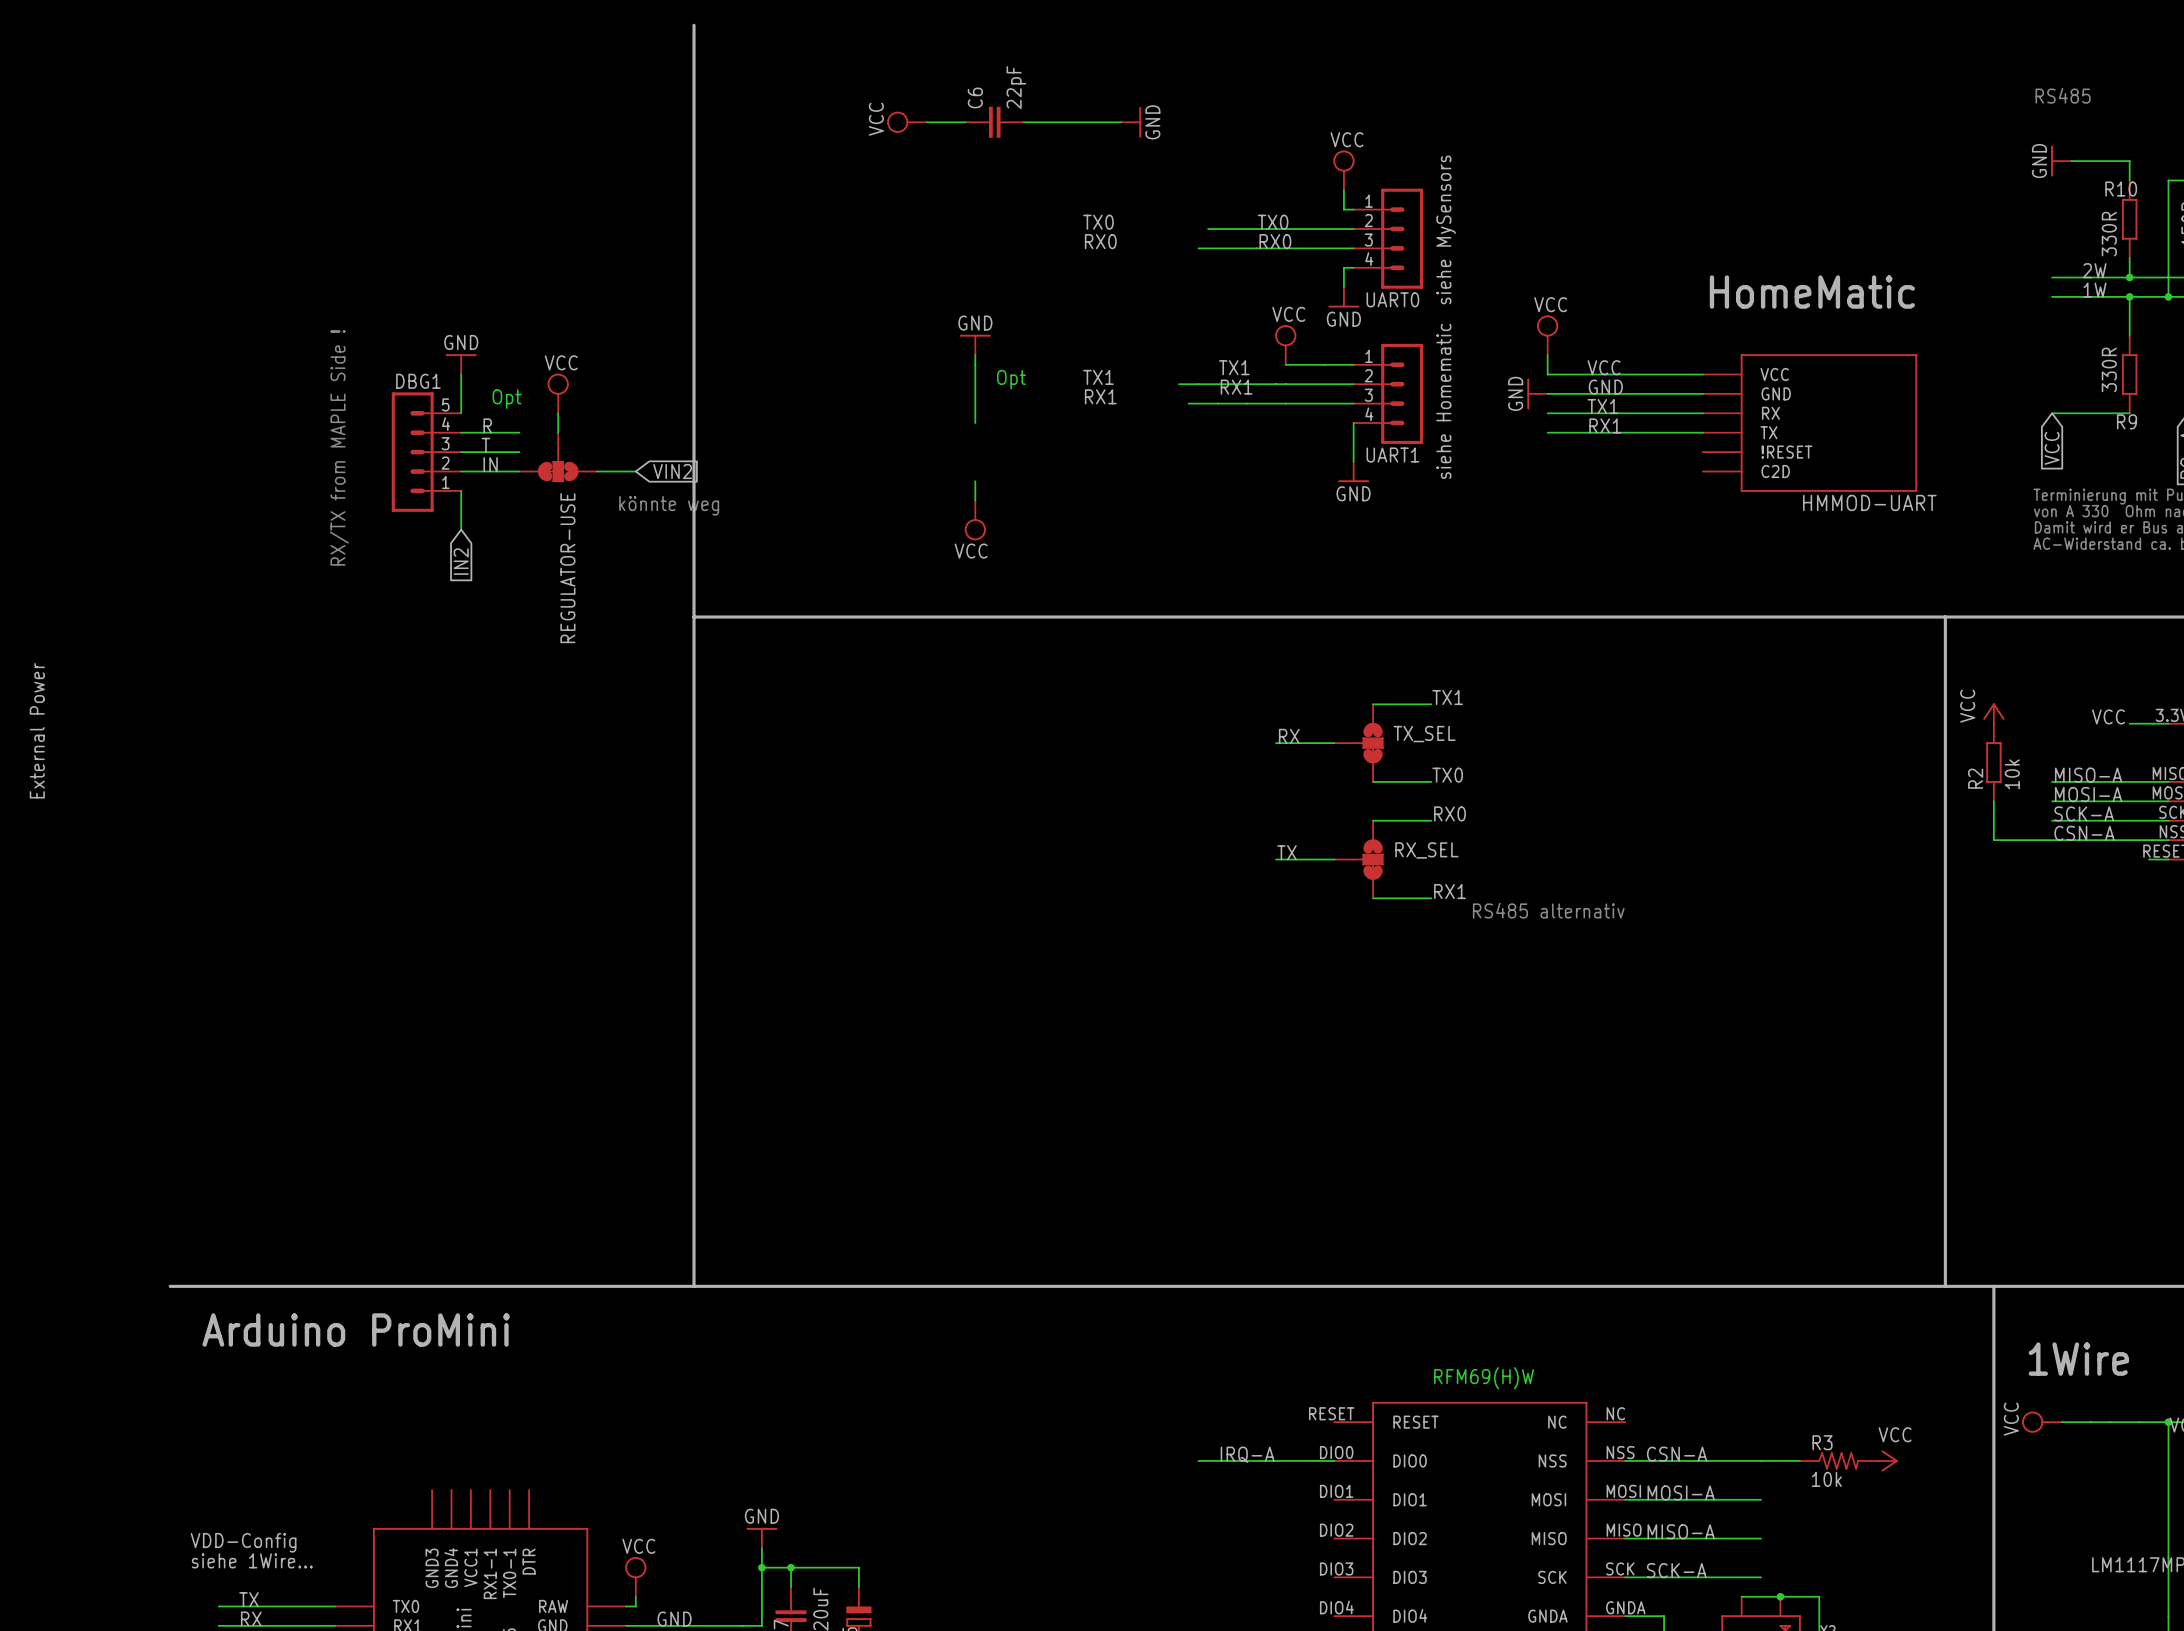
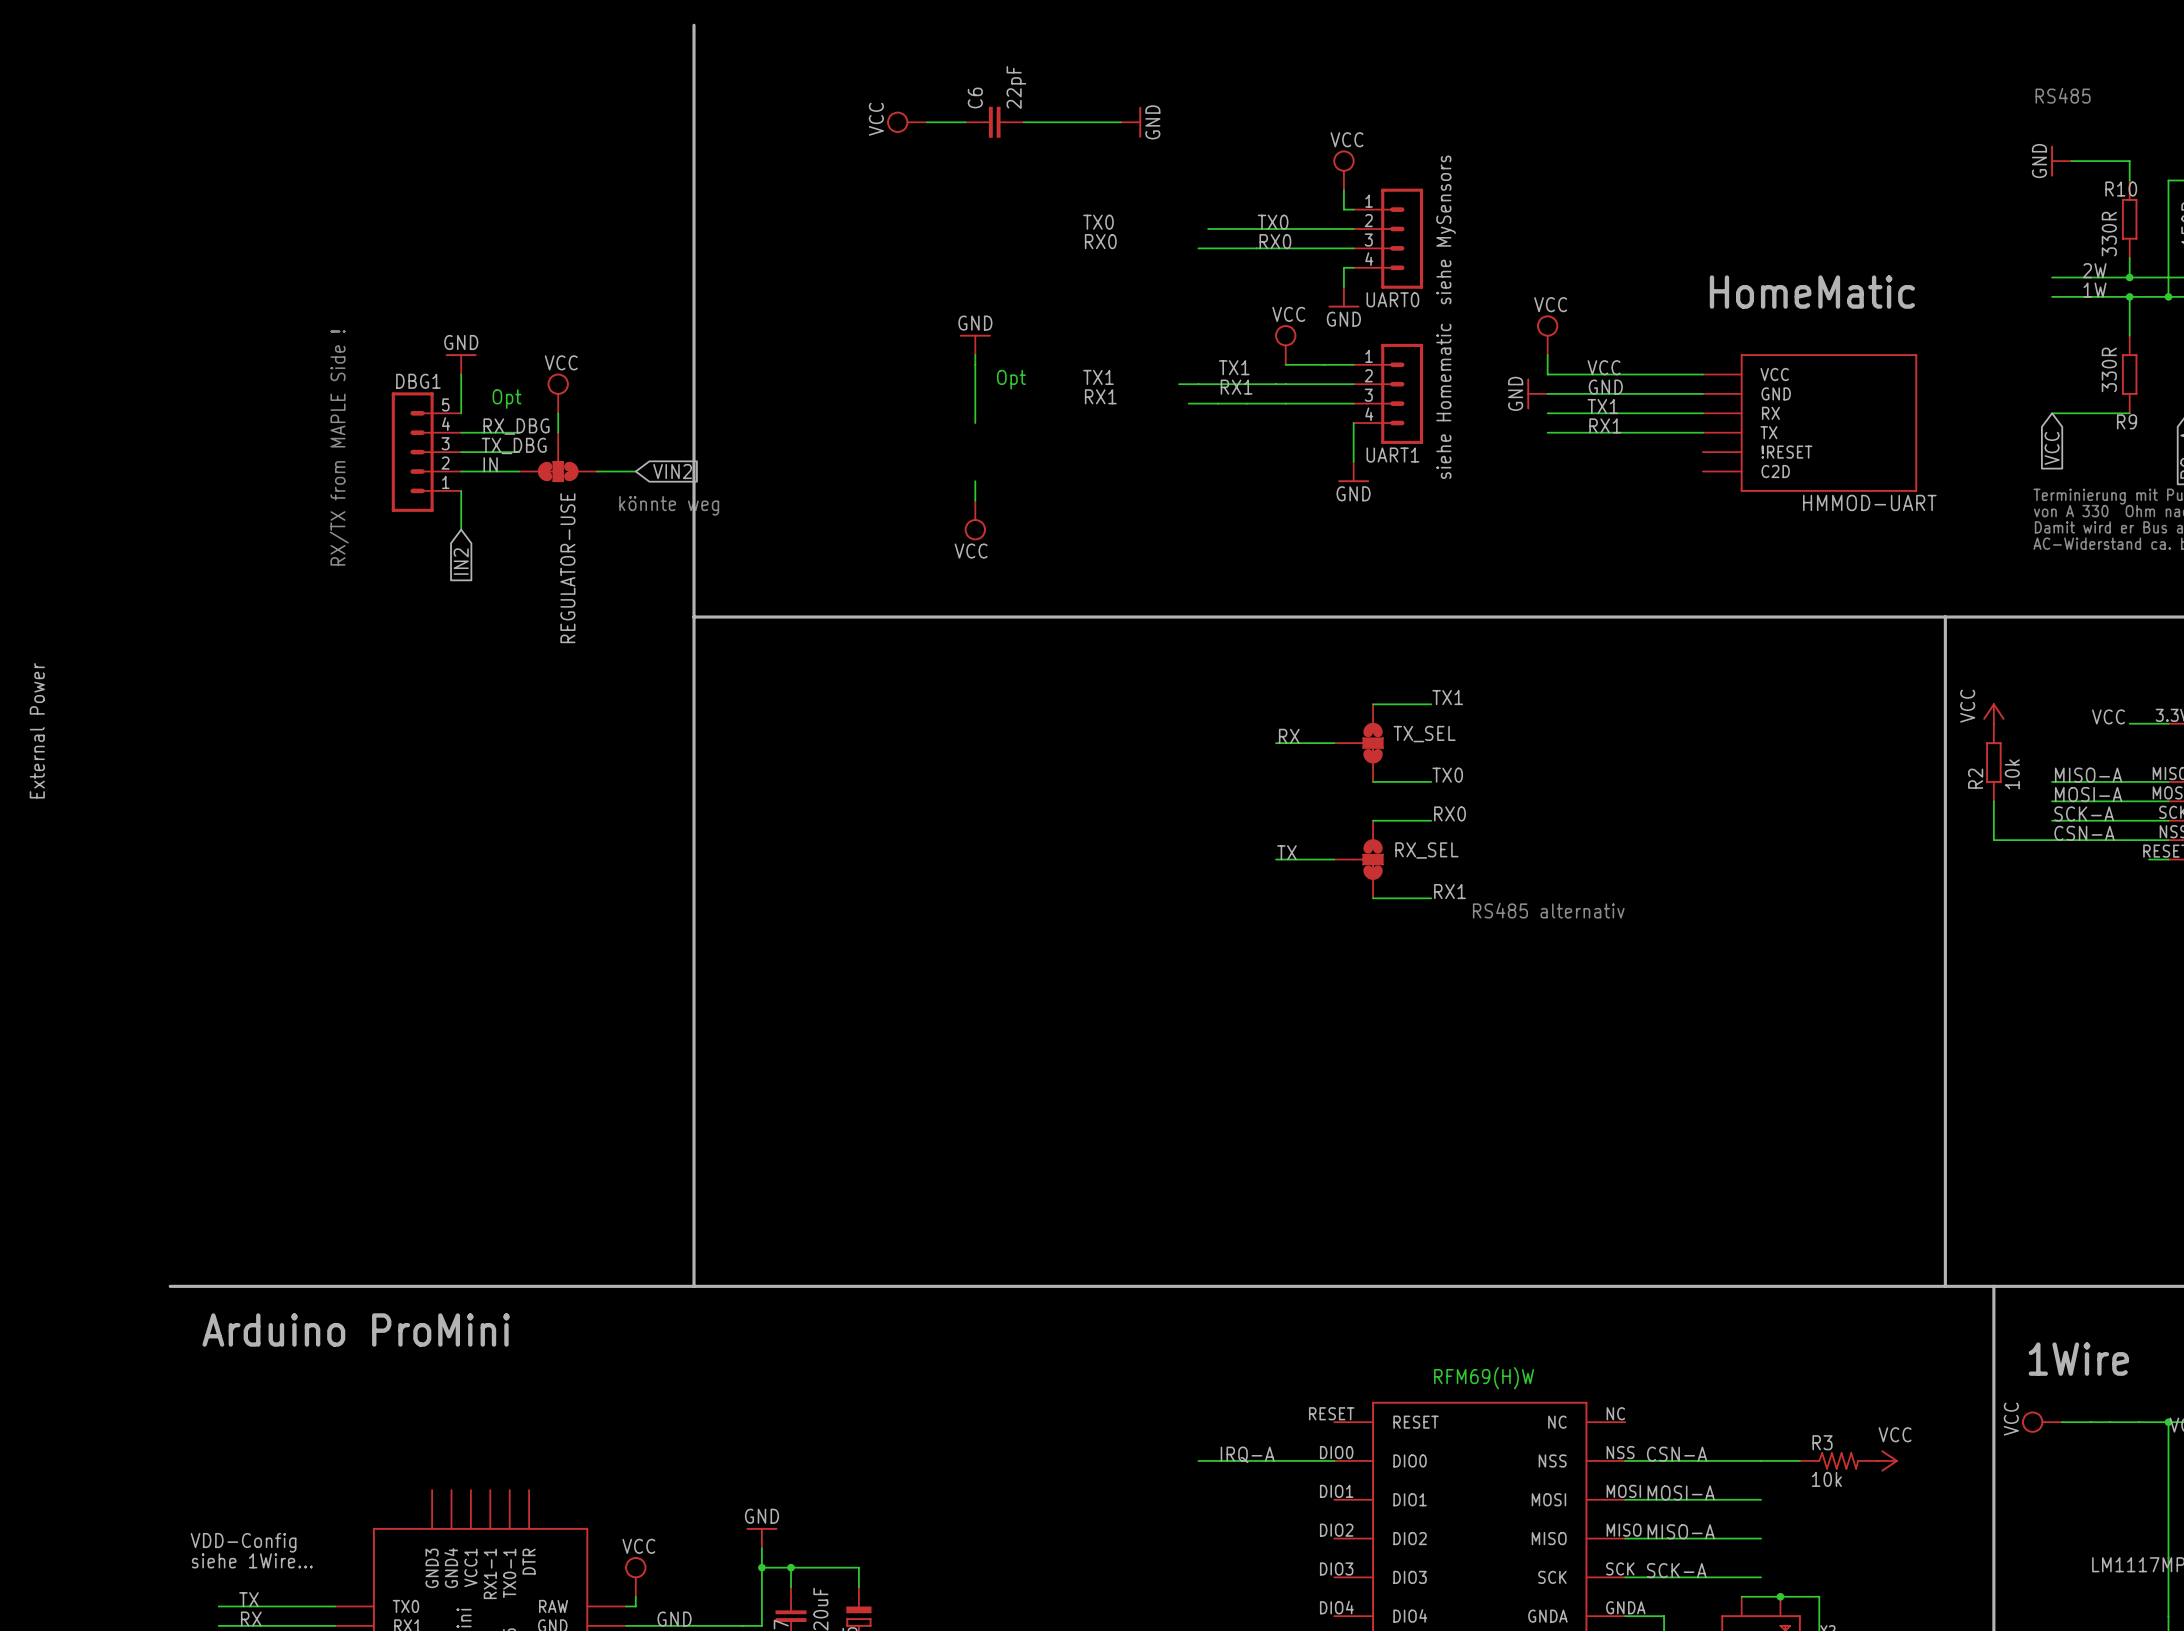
label: R (487, 425) -> RX_DBG (516, 426)
label: T (485, 445) -> TX_DBG (514, 445)

